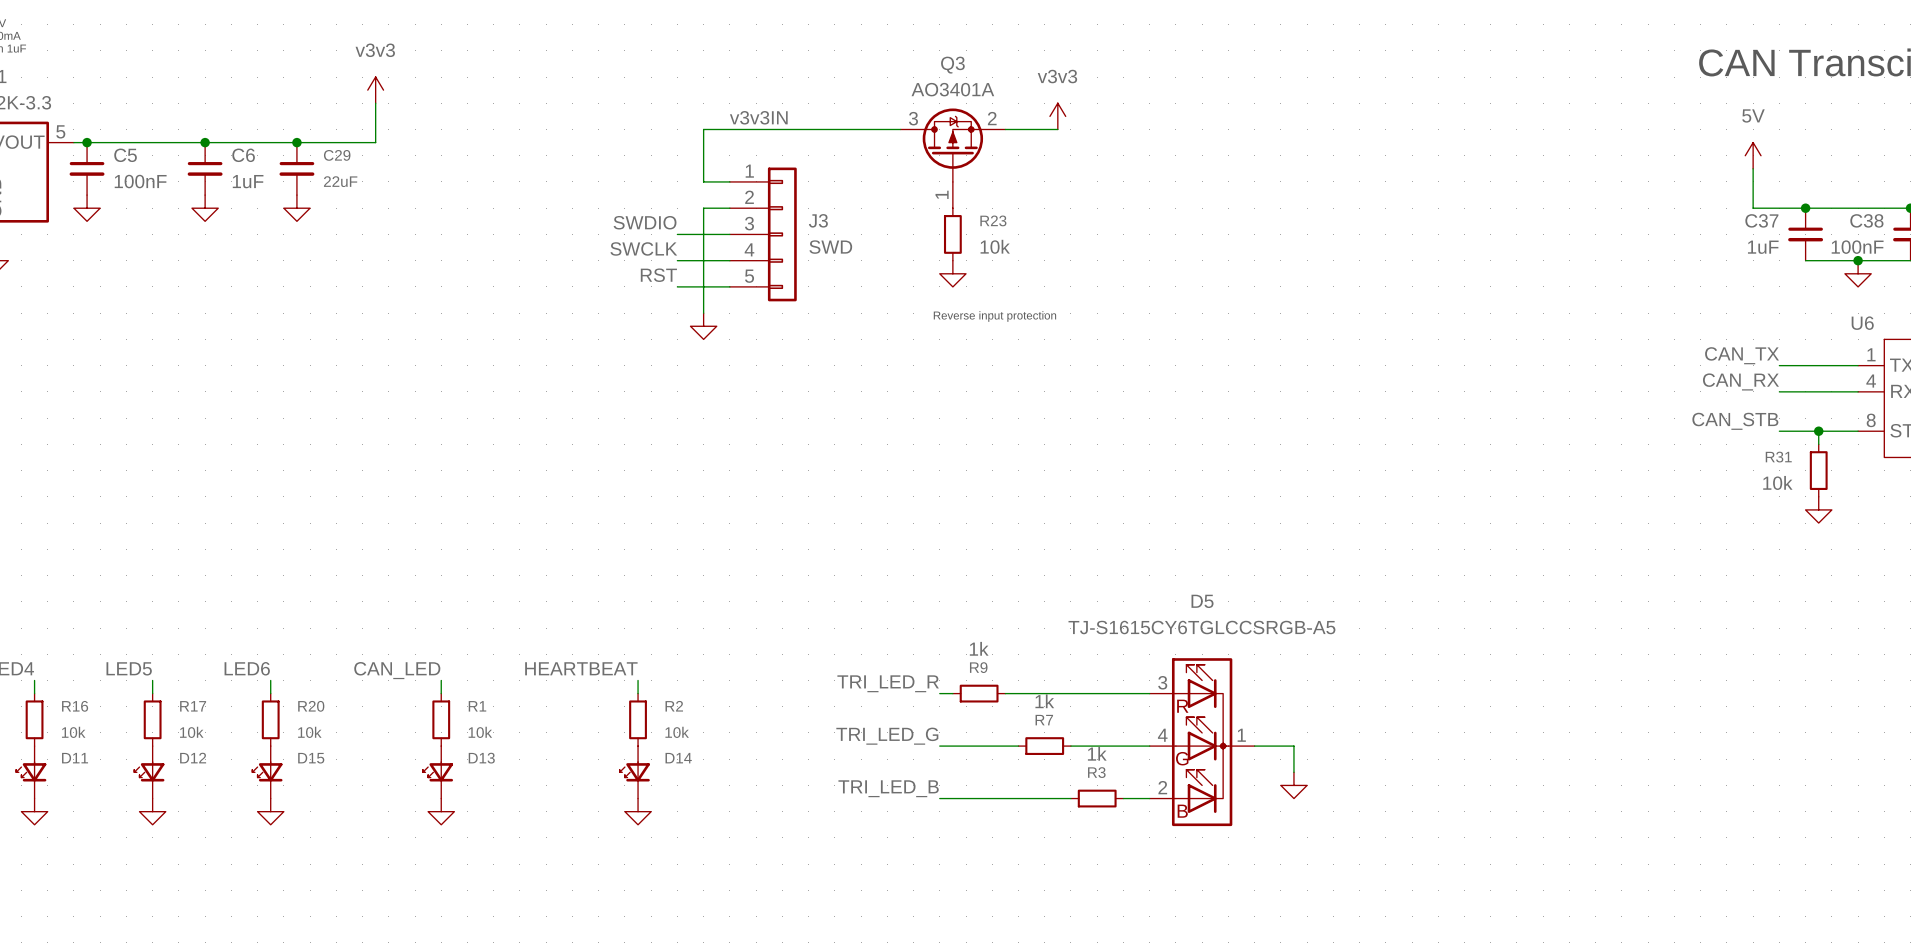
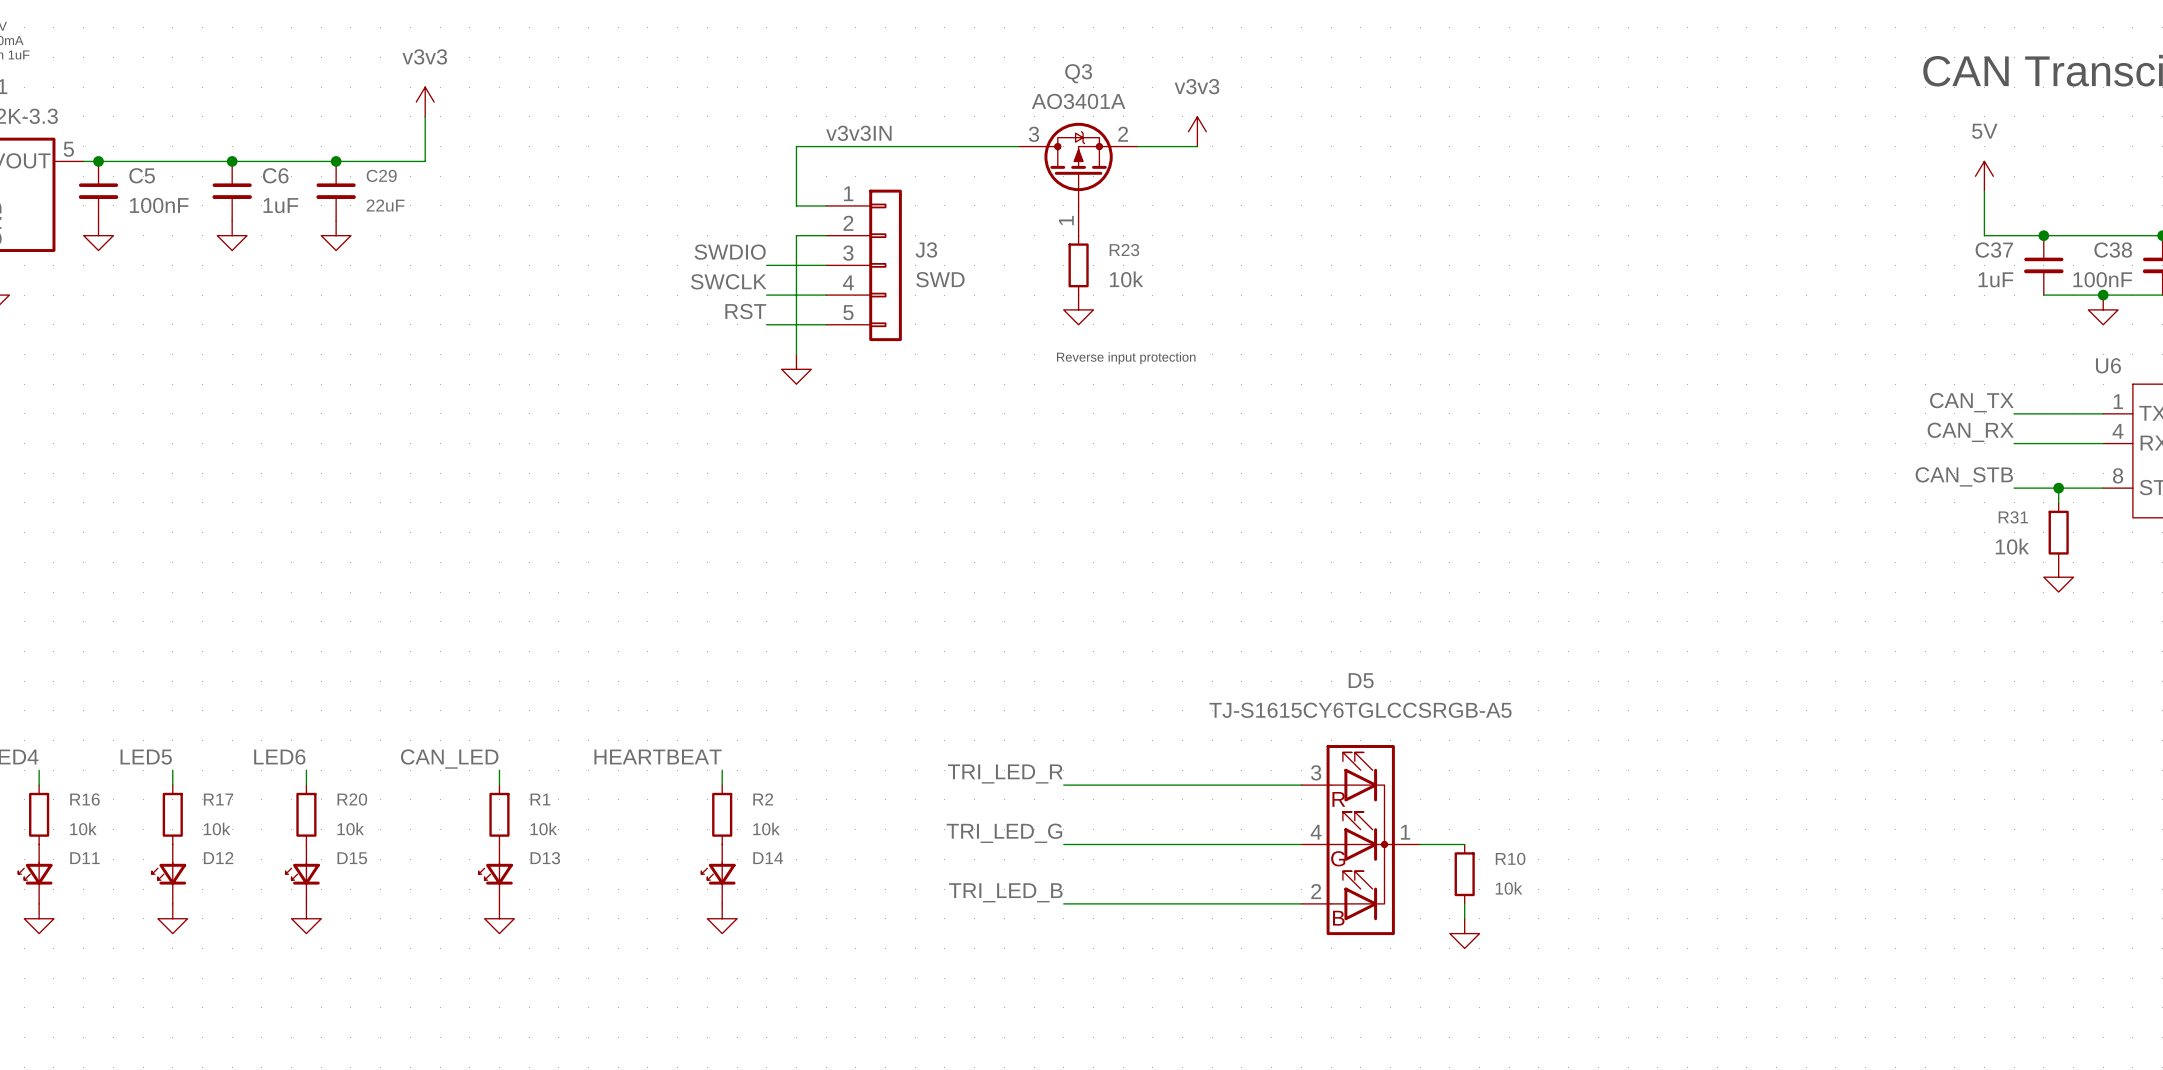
wire: none -> (1078, 785) (1137, 785)
R9: 1k (979, 693) -> none
wire: none -> (1152, 844) (1212, 844)
R7: 1k (1044, 746) -> none
wire: (1293, 746) (1293, 772) -> none
R10: none -> 10k (1464, 874)
power symbol position: (1293, 785) -> (1464, 933)
wire: none -> (1212, 903) (1271, 903)
R3: 1k (1097, 798) -> none
wire: none -> (1464, 903) (1464, 918)

